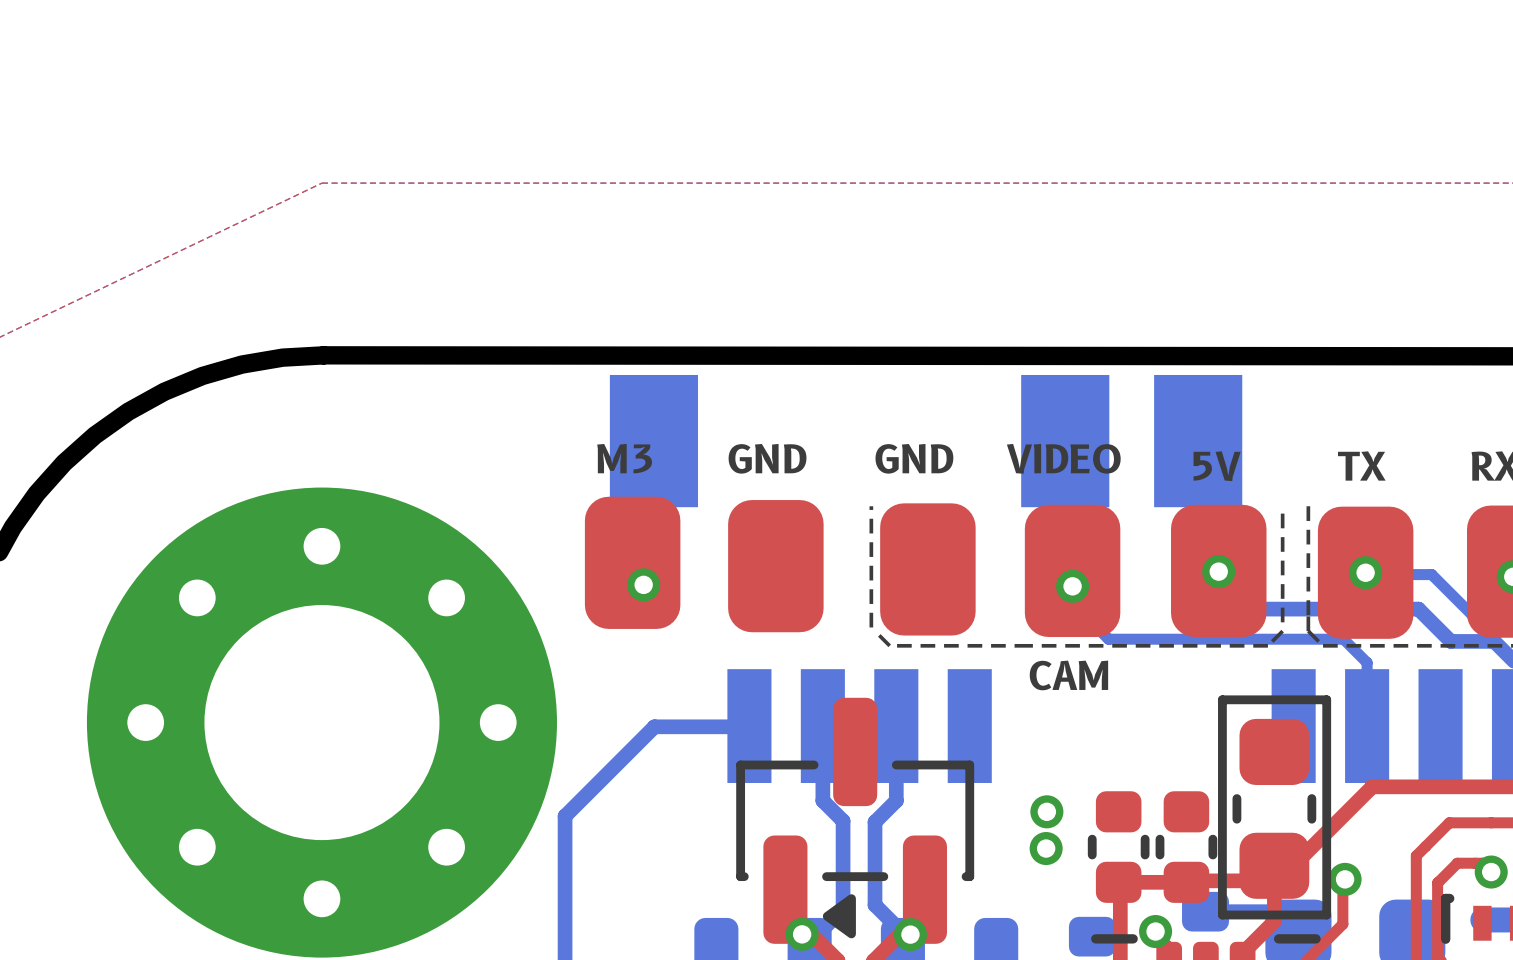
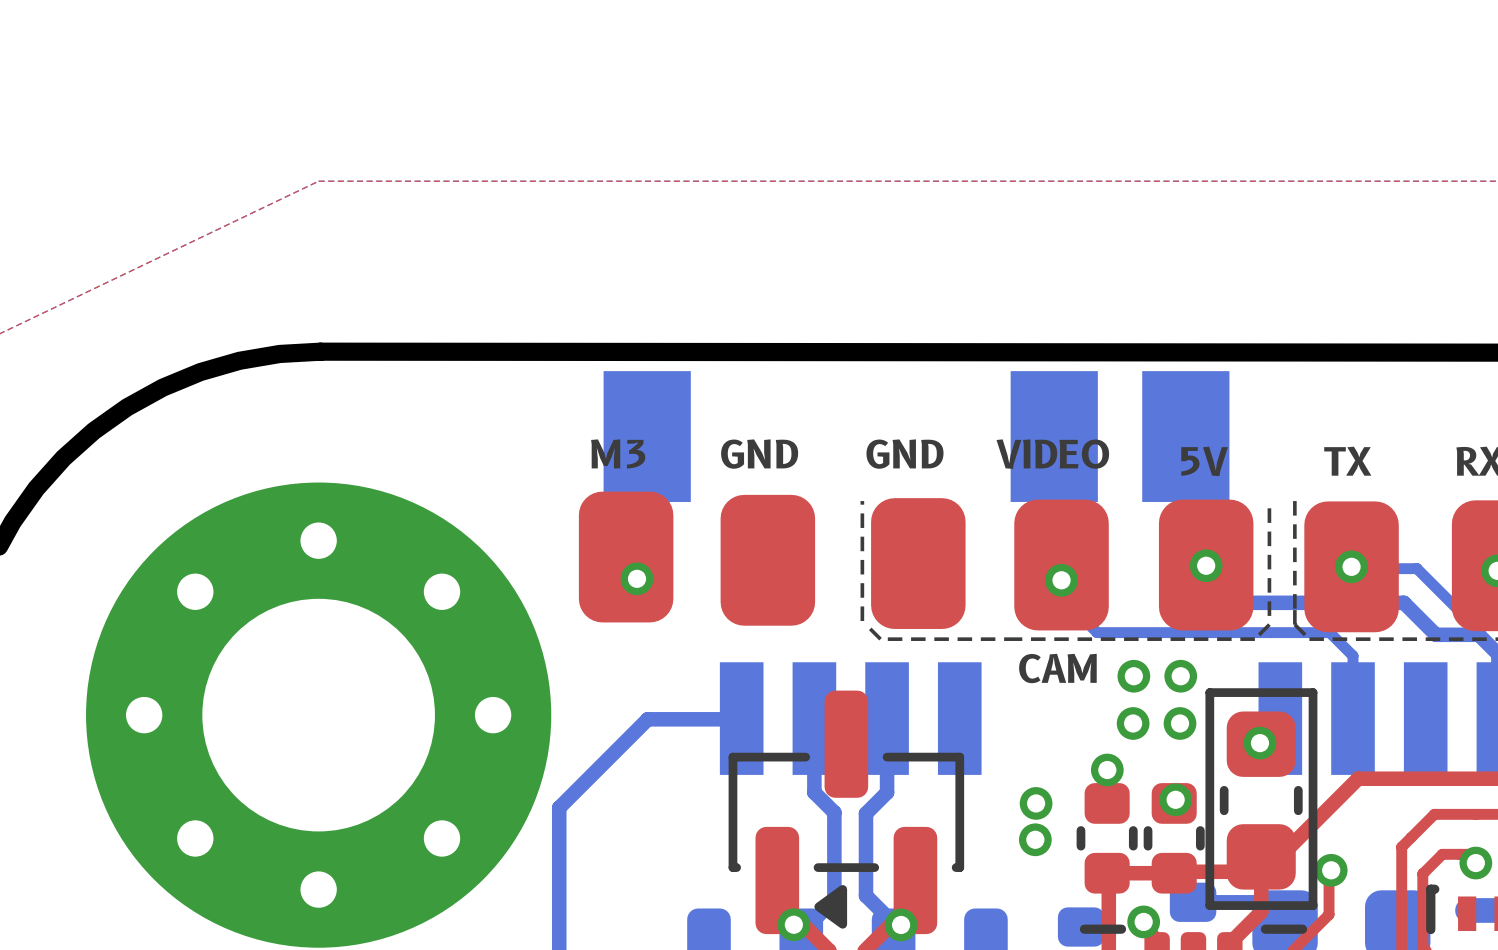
via: none -> (1133, 676)
via: none -> (1180, 676)
via: none -> (1133, 723)
via: none -> (1180, 723)
via: none -> (1259, 743)
via: none -> (1107, 770)
via: none -> (1175, 799)

